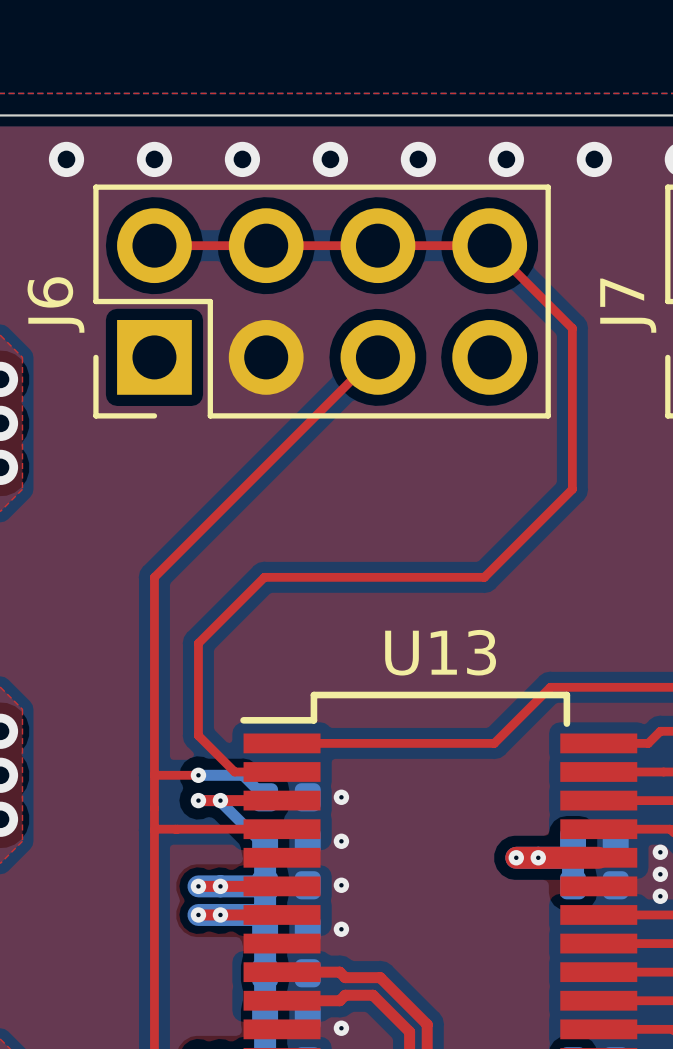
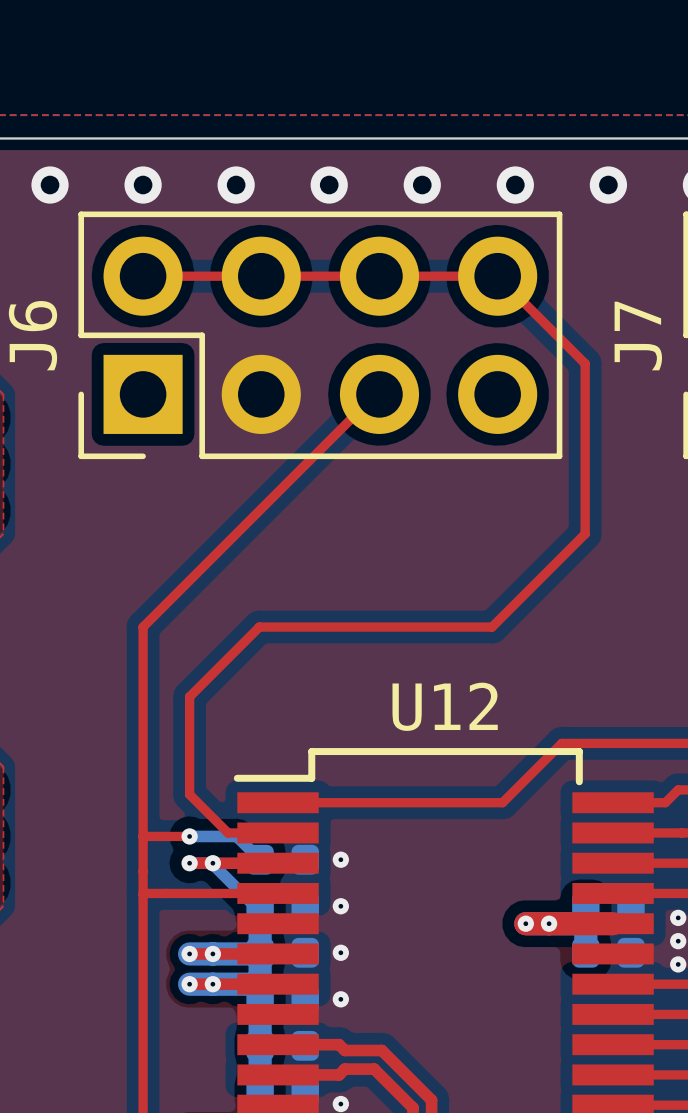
U13 name: U13 (440, 652) -> U12 (445, 706)

